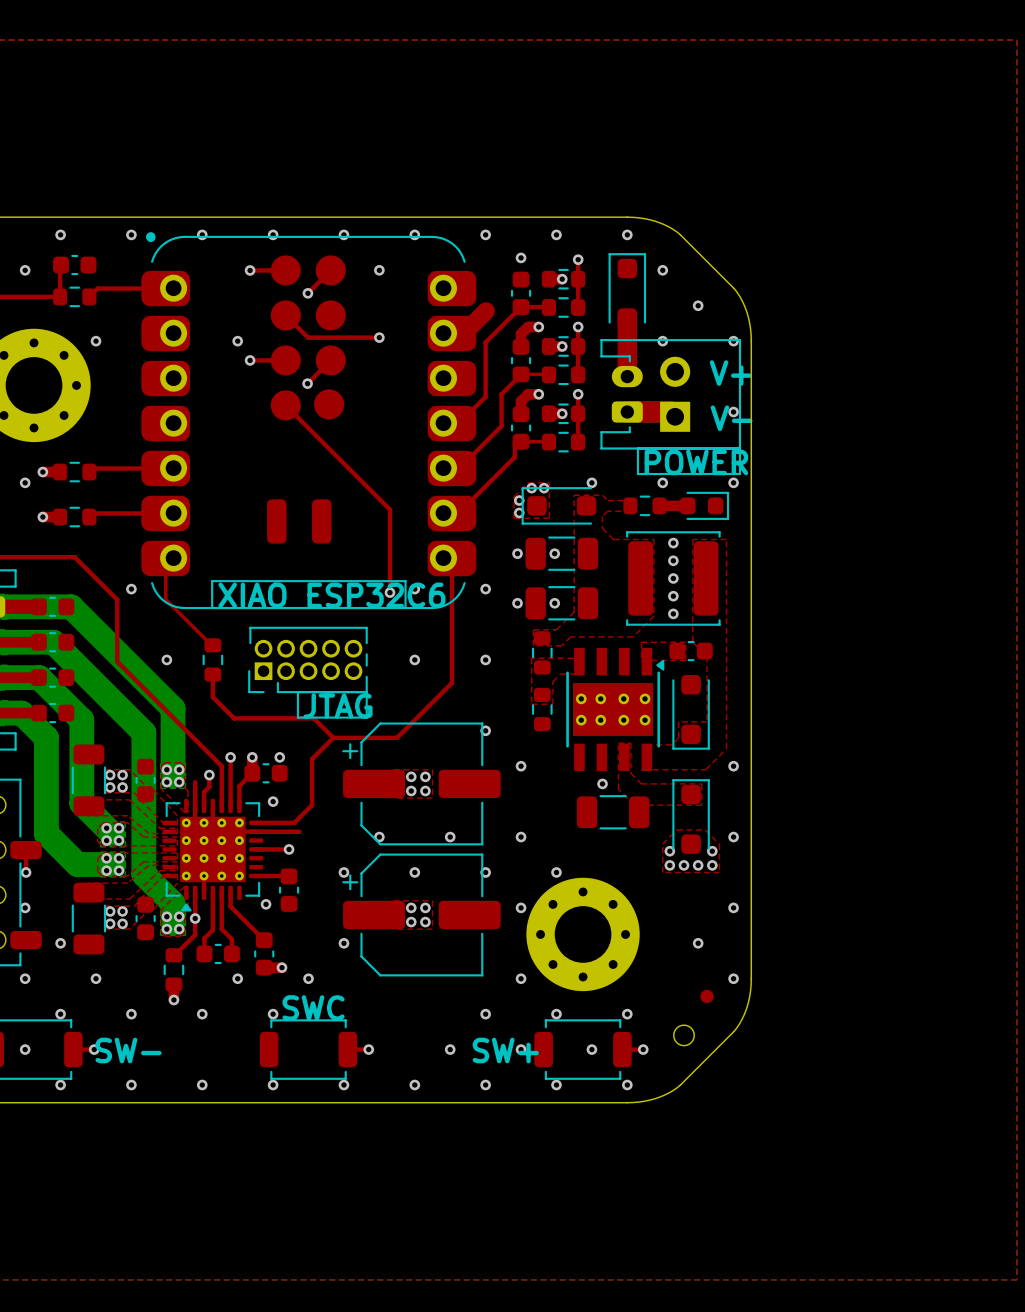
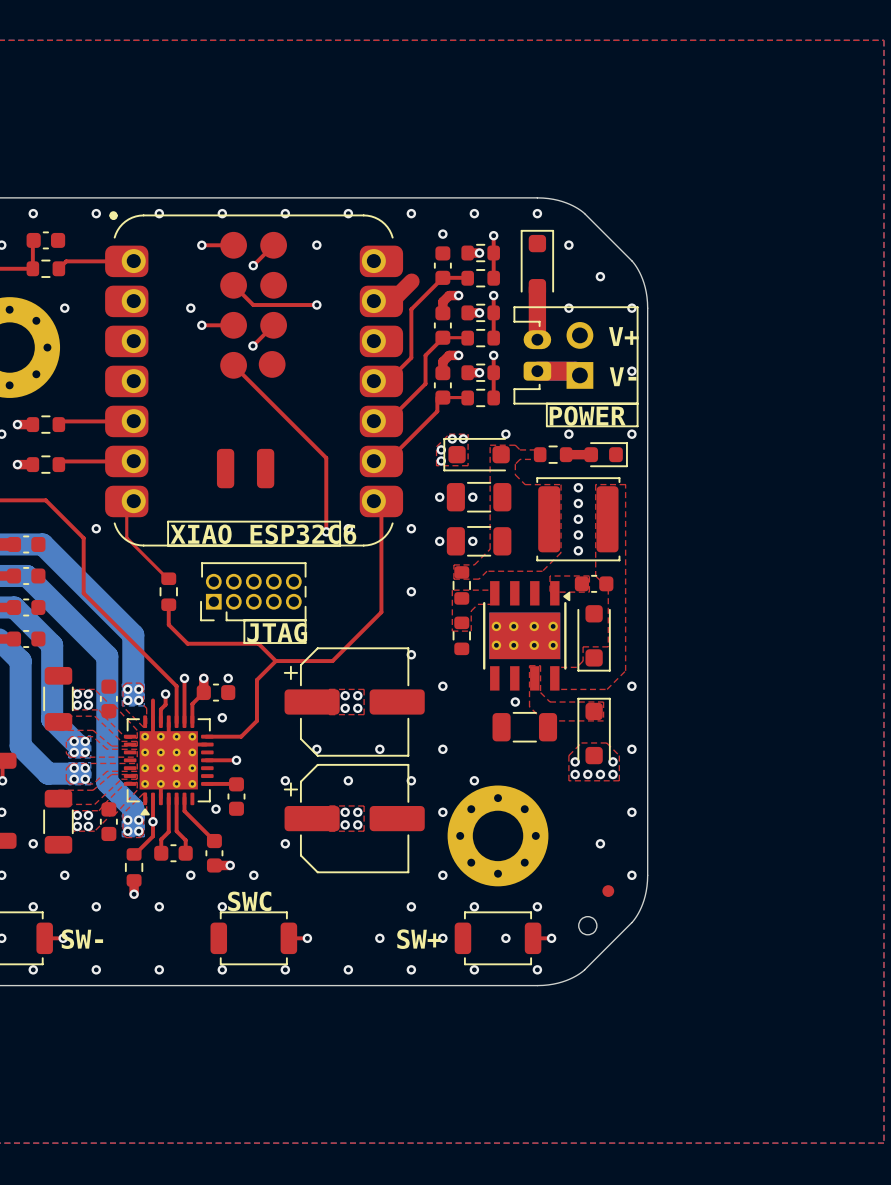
via: (166, 659) -> none
via: (414, 659) -> none
top track: (256, 831) (299, 831) -> none

